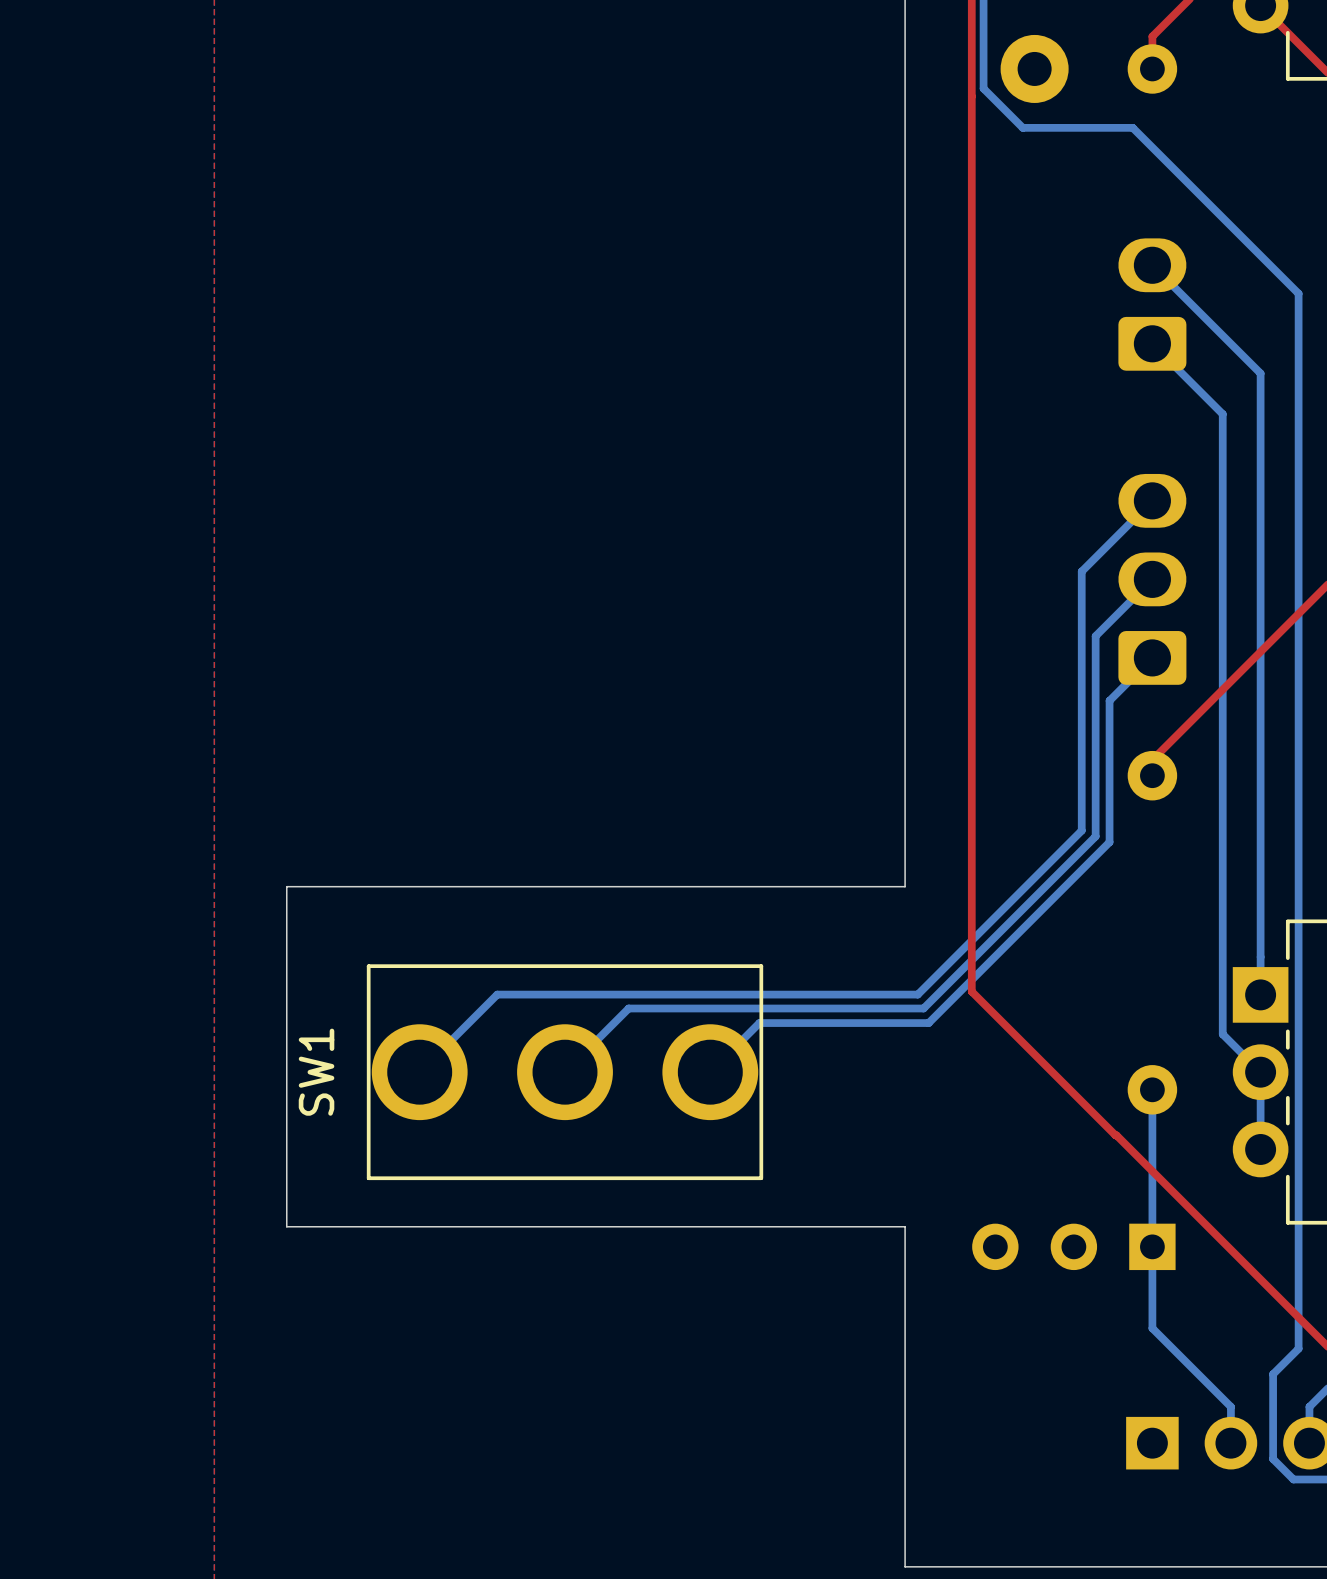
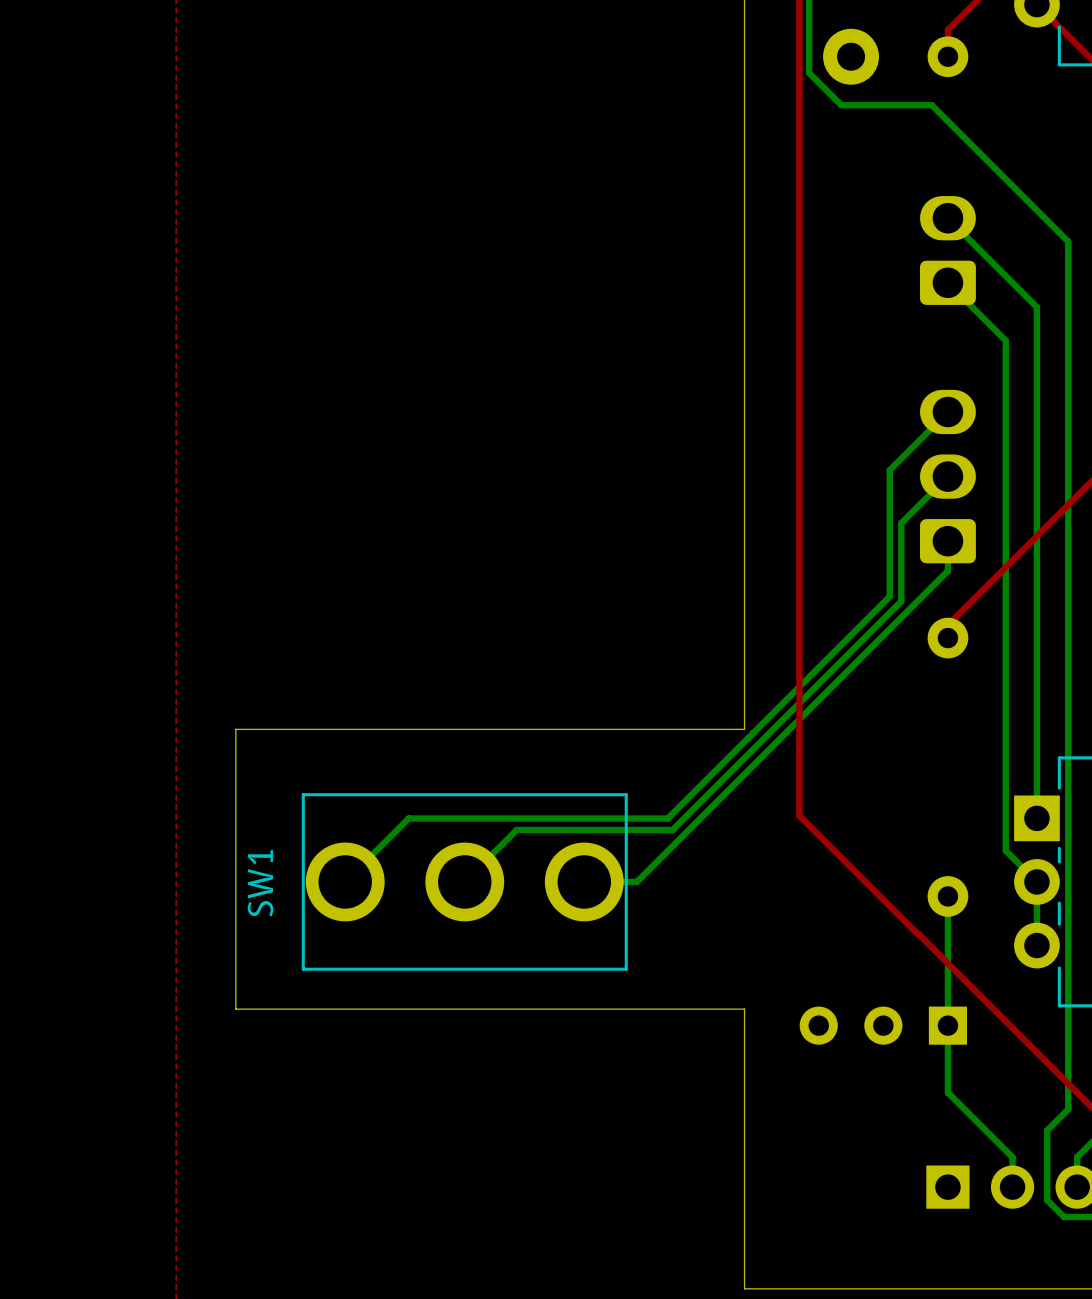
bottom track: (1152, 657) (1109, 700) (1109, 842) (928, 1023) (759, 1023) (710, 1072) -> (947, 541) (947, 570) (636, 881) (584, 881)
bottom track: (1081, 725) (1081, 830) (917, 994) (497, 994) (419, 1072) -> (889, 596) (667, 818) (408, 818) (345, 881)
bottom track: (1095, 731) (1095, 836) (923, 1008) (628, 1008) -> (901, 601) (672, 829) (516, 829)

